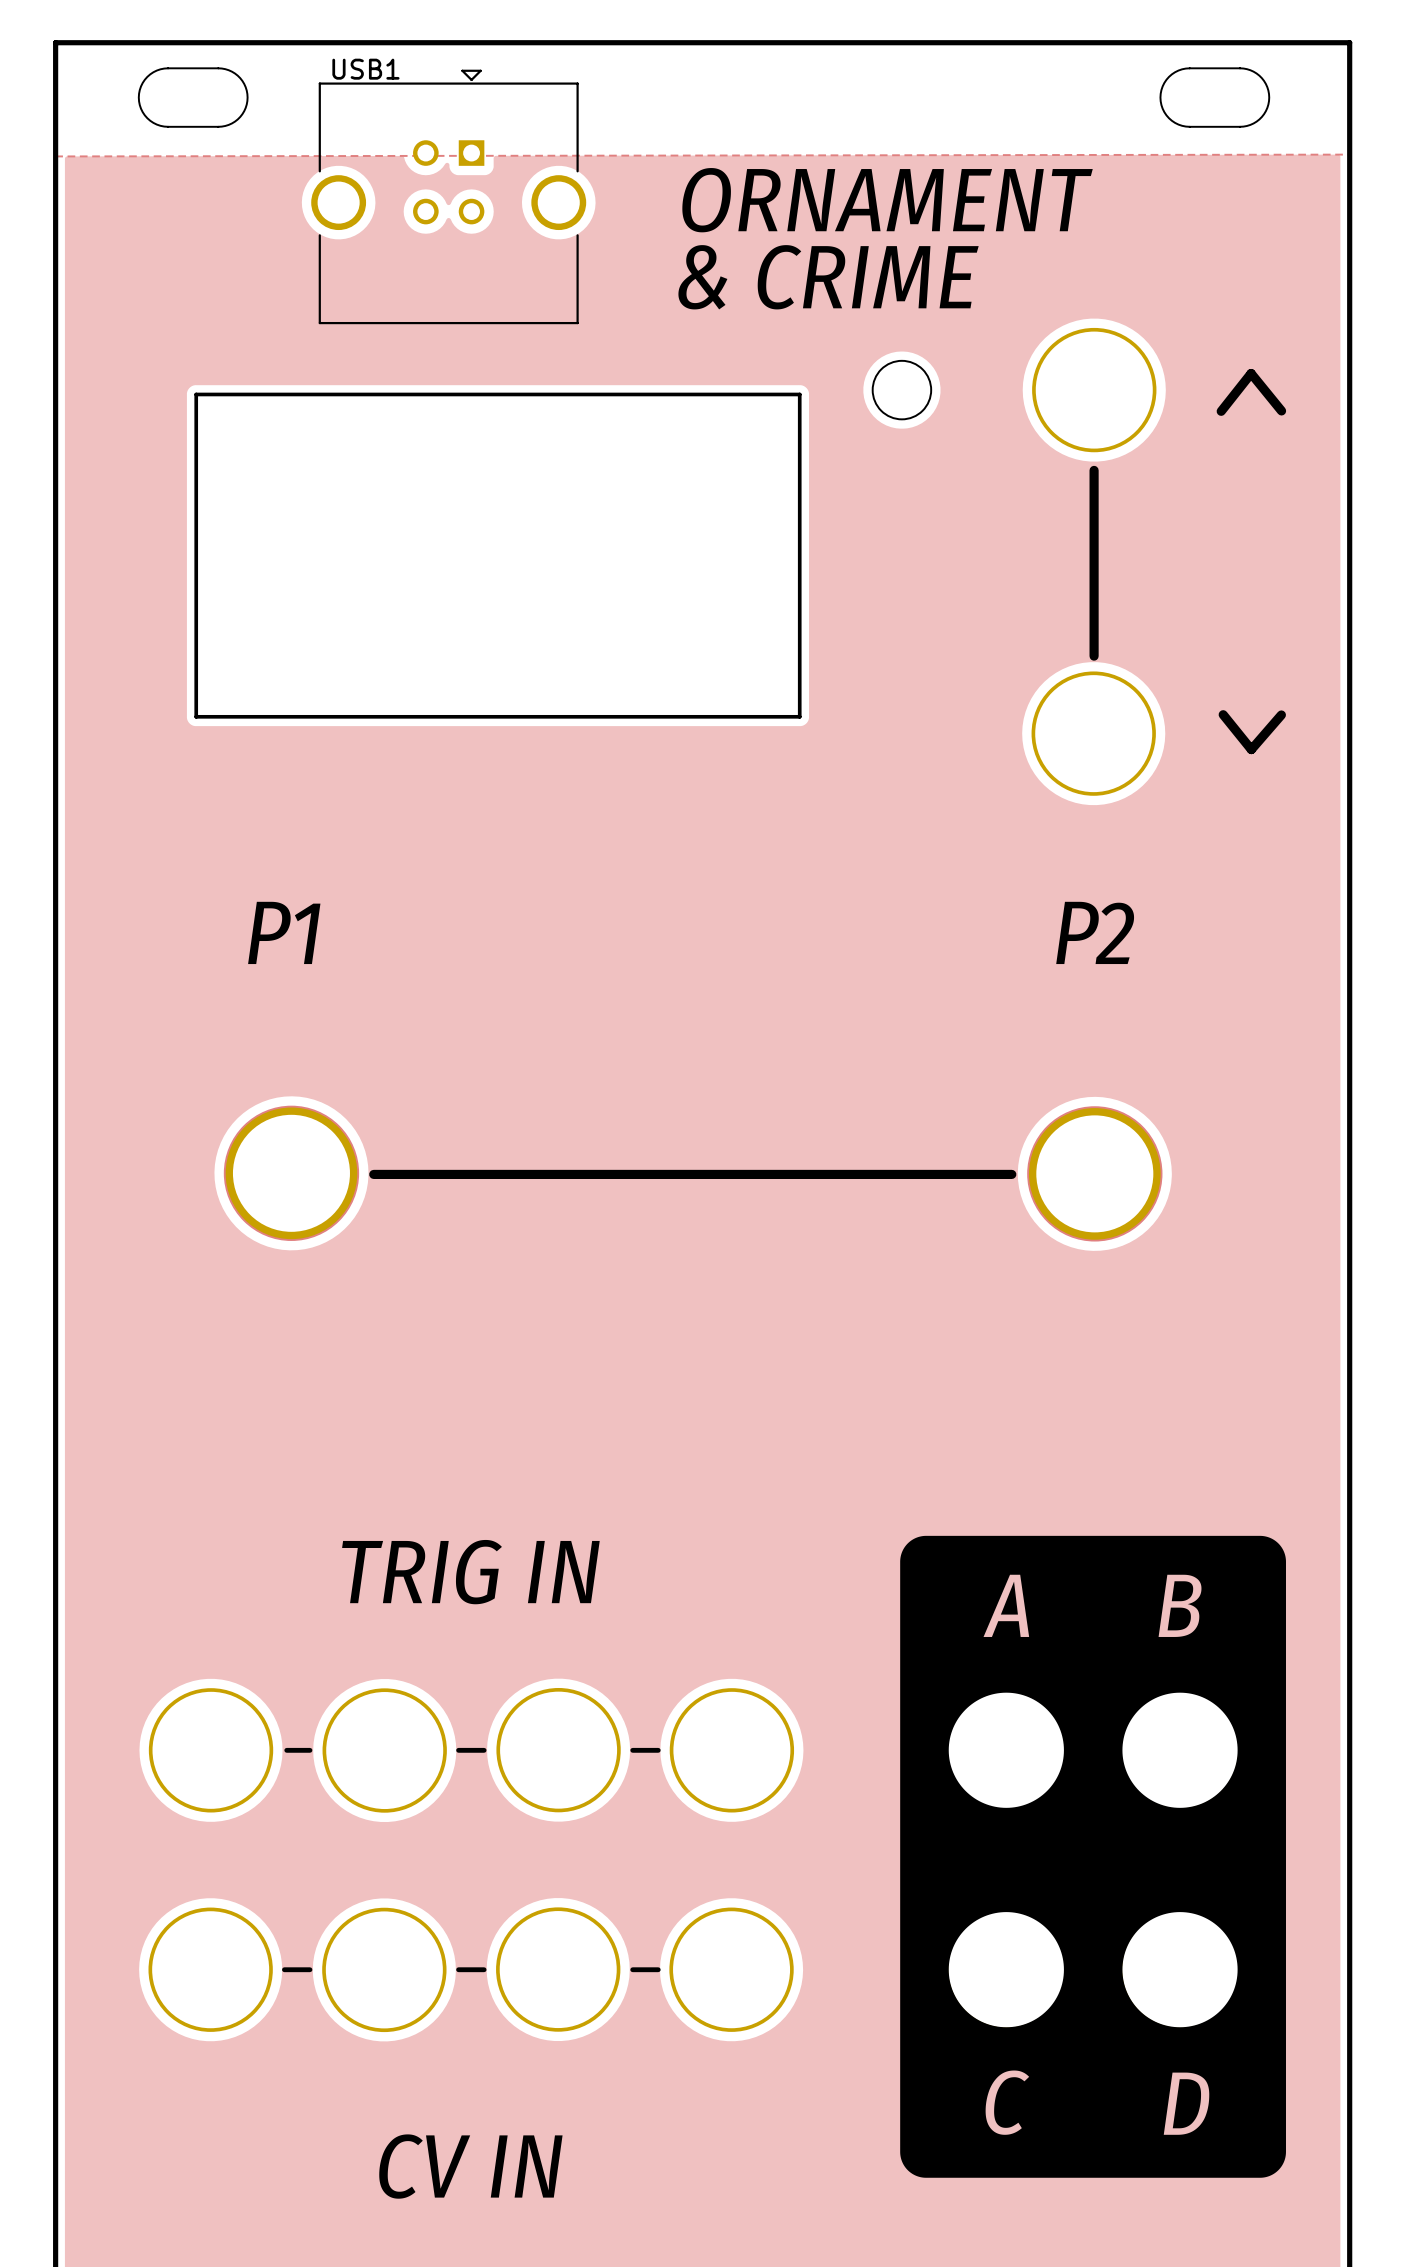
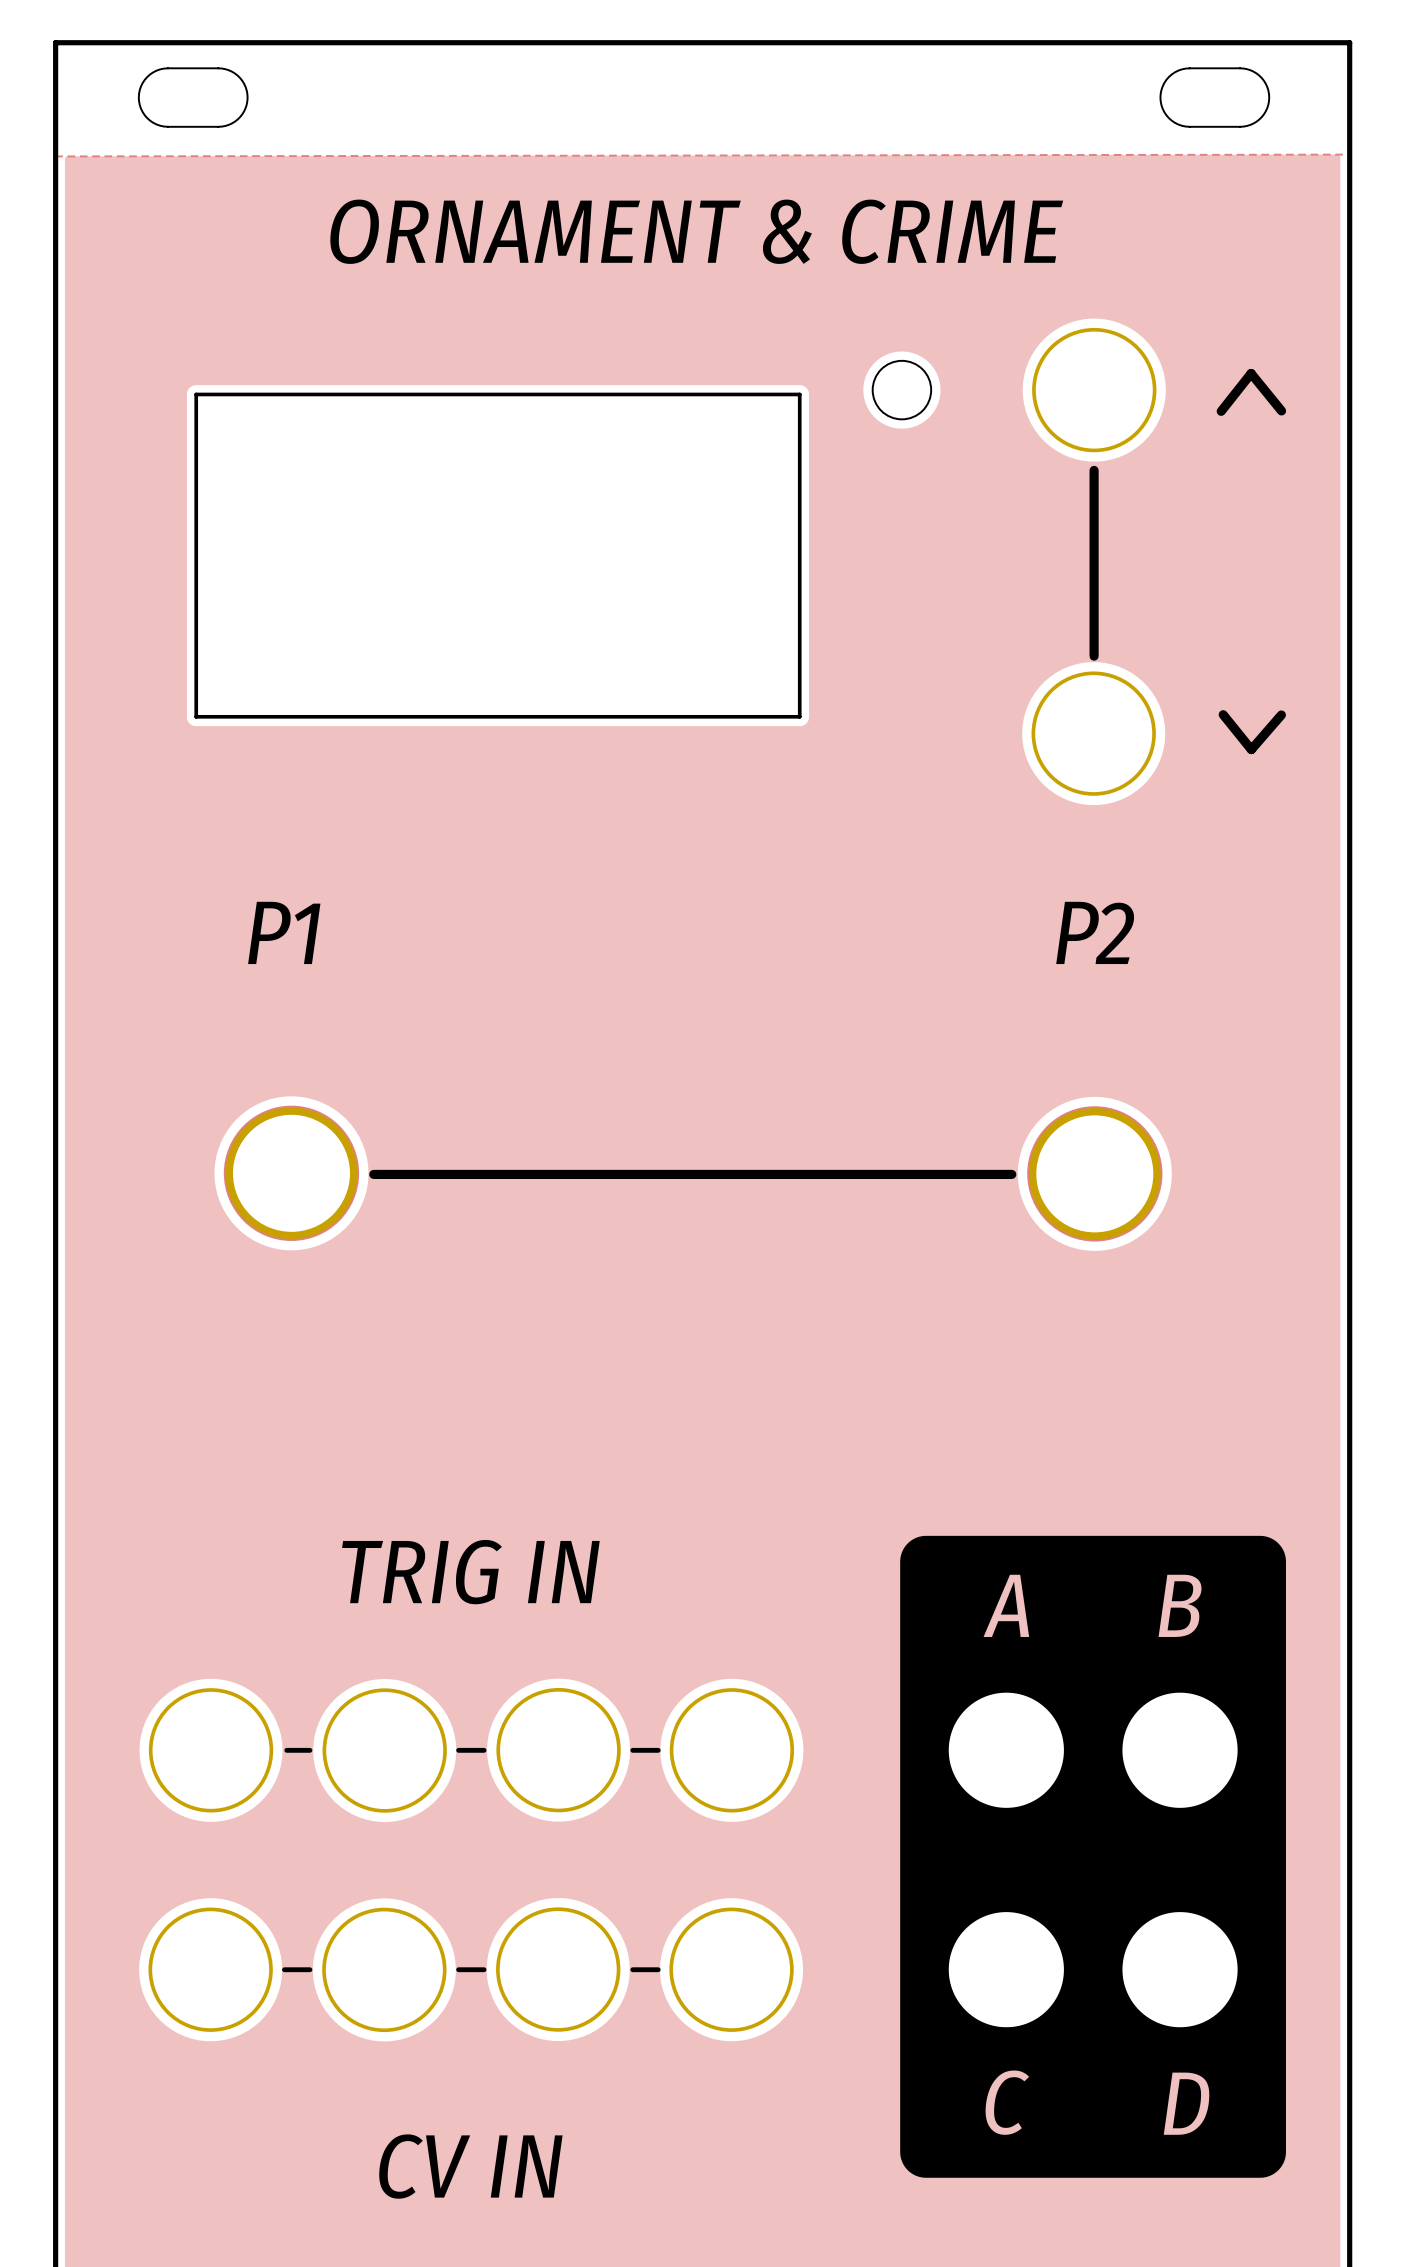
drawing: [738, 169, 781, 232] -> none
drawing: [873, 169, 1044, 309] -> none
USB1: (448, 196) -> none
drawing: none -> [386, 200, 484, 263]
drawing: none -> [534, 200, 641, 263]
drawing position: (706, 200) -> (354, 231)
drawing position: (811, 200) -> (667, 231)
drawing position: (857, 200) -> (505, 231)
drawing: none -> [887, 200, 930, 263]
drawing: none -> [957, 200, 1064, 263]
drawing position: (1072, 200) -> (720, 231)
drawing: [802, 246, 846, 309] -> none
drawing position: (702, 277) -> (787, 231)
drawing position: (779, 277) -> (864, 231)
drawing position: (860, 277) -> (944, 231)

